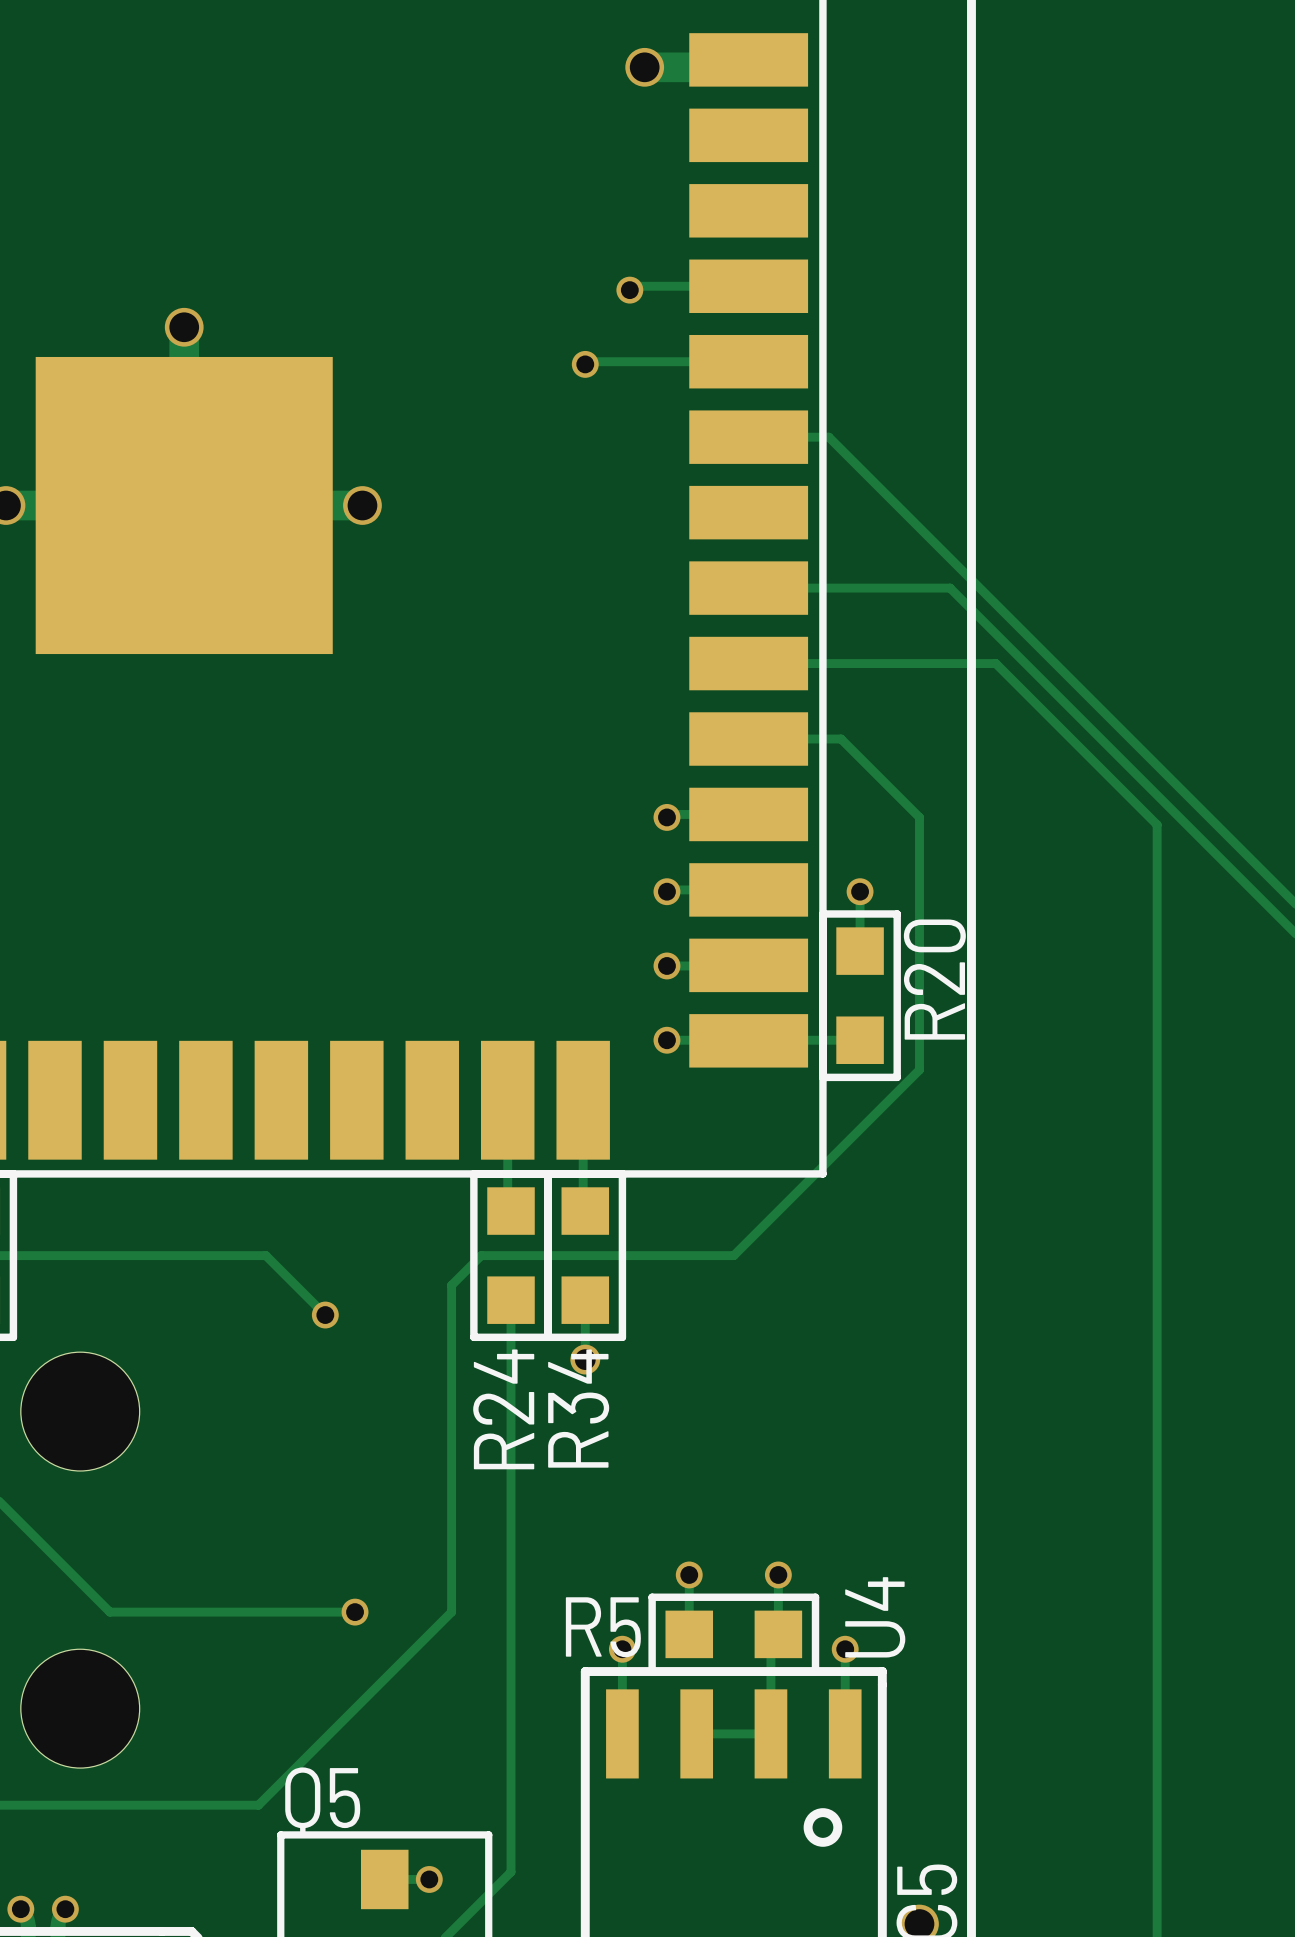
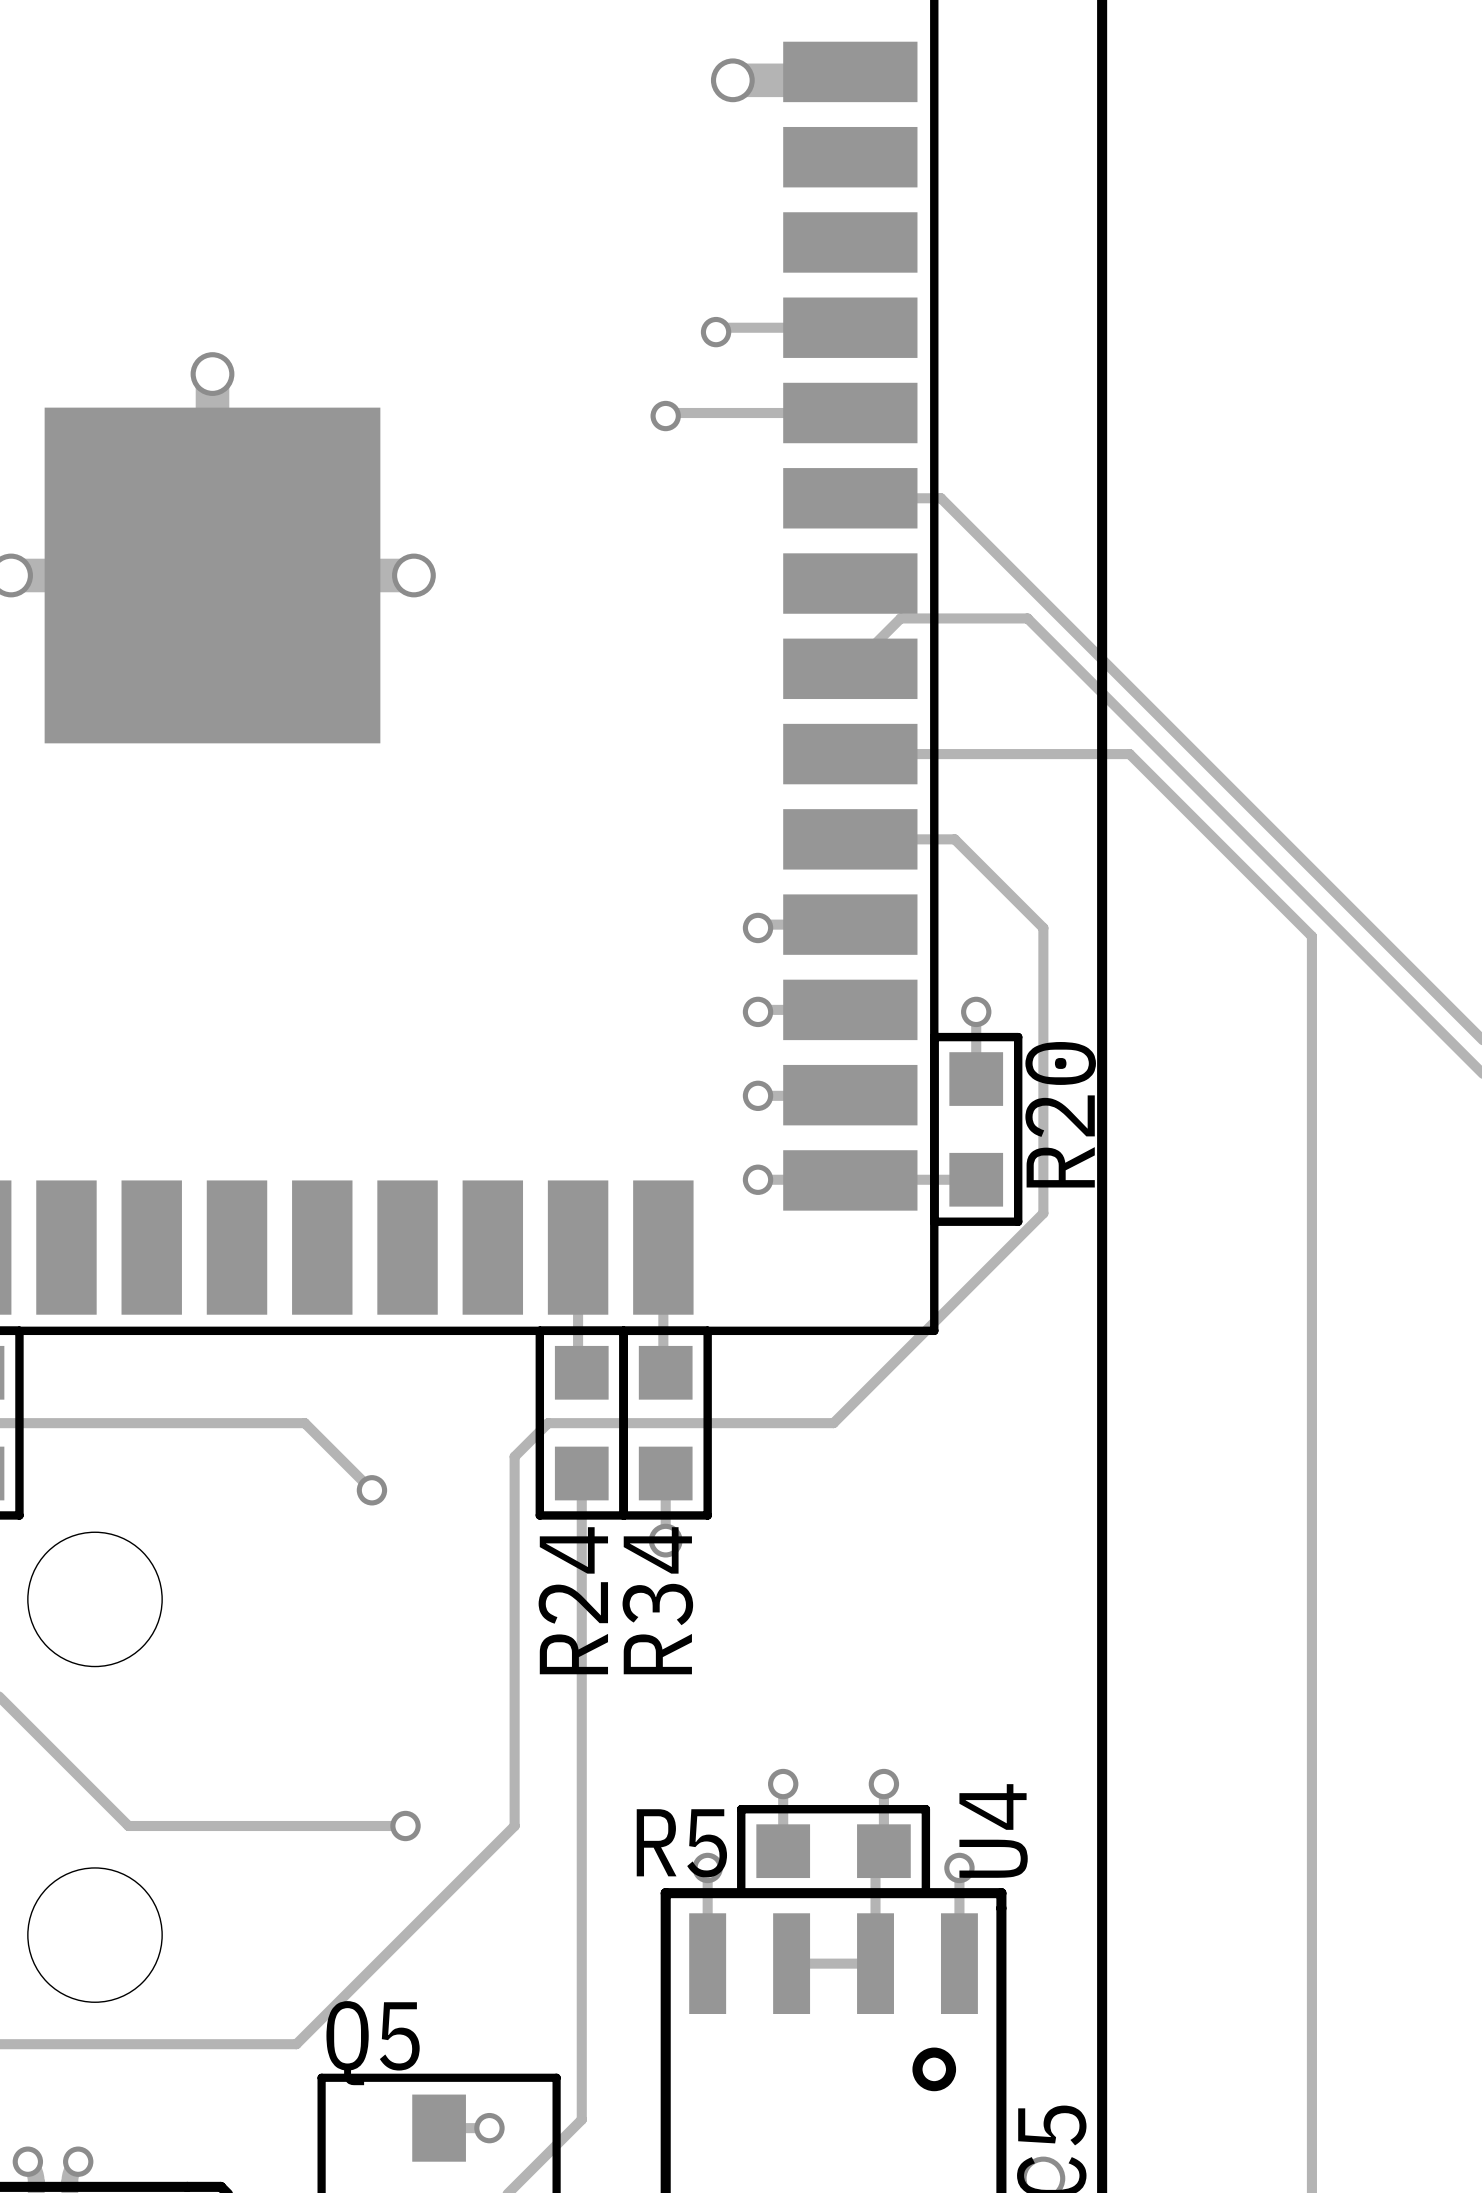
track: (950, 588) (748, 588) -> (1077, 668) (1027, 618) (900, 618) (850, 668)

